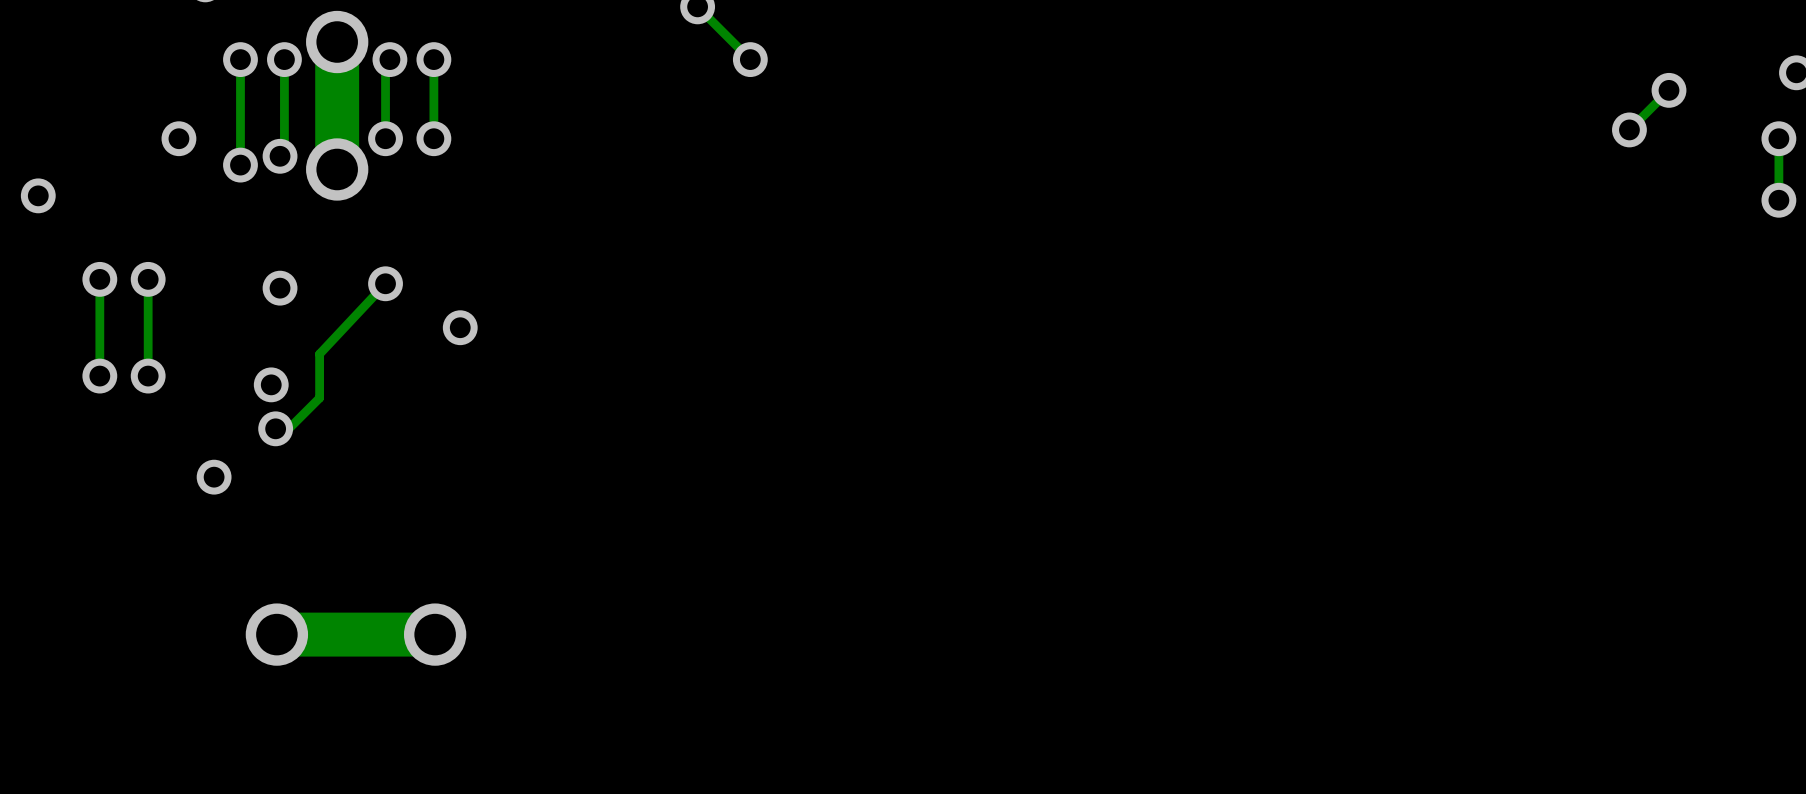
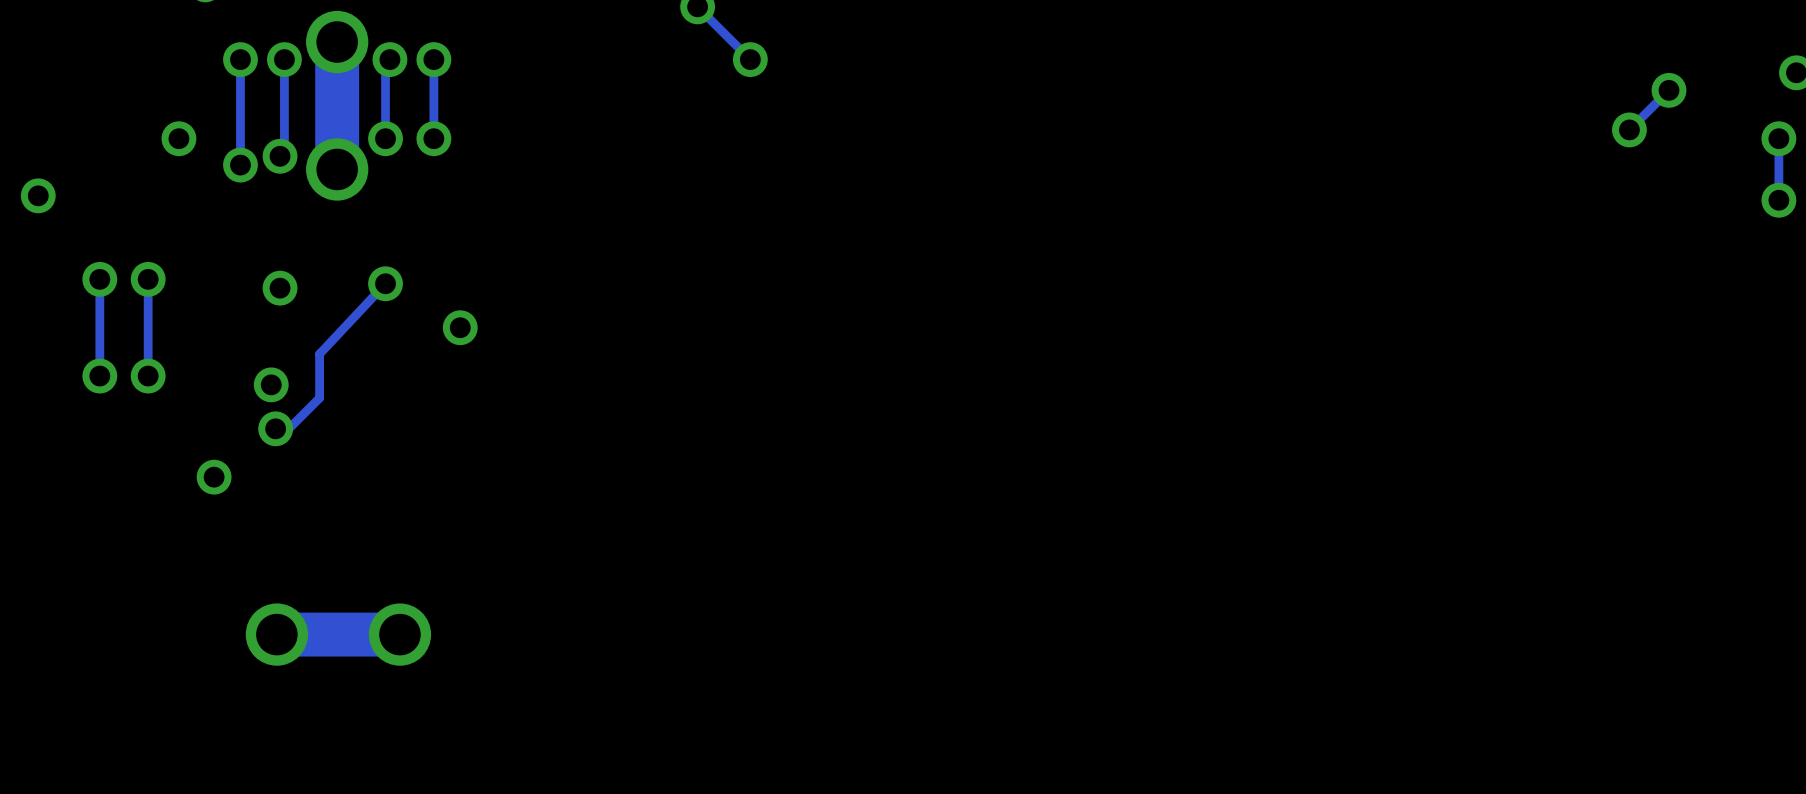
via position: (435, 634) -> (399, 634)

